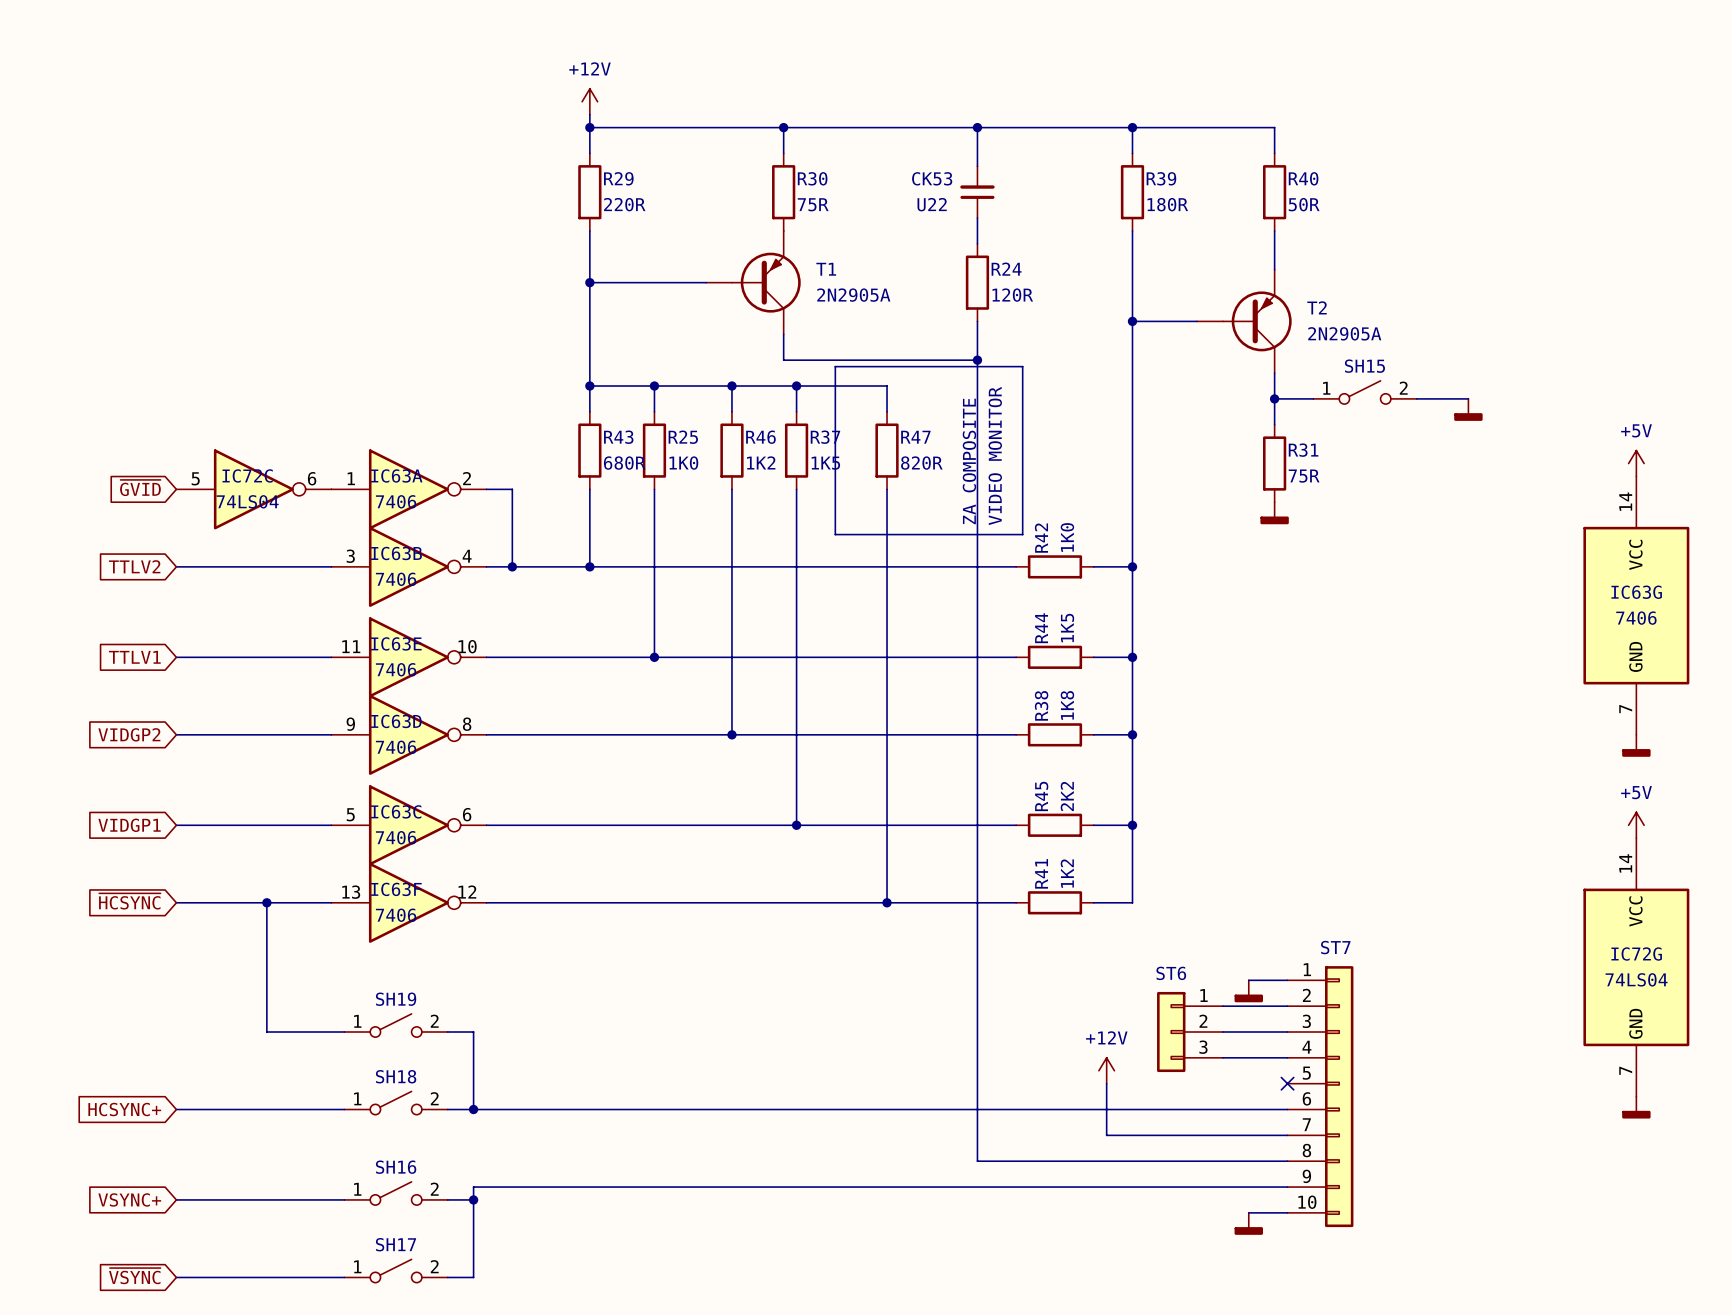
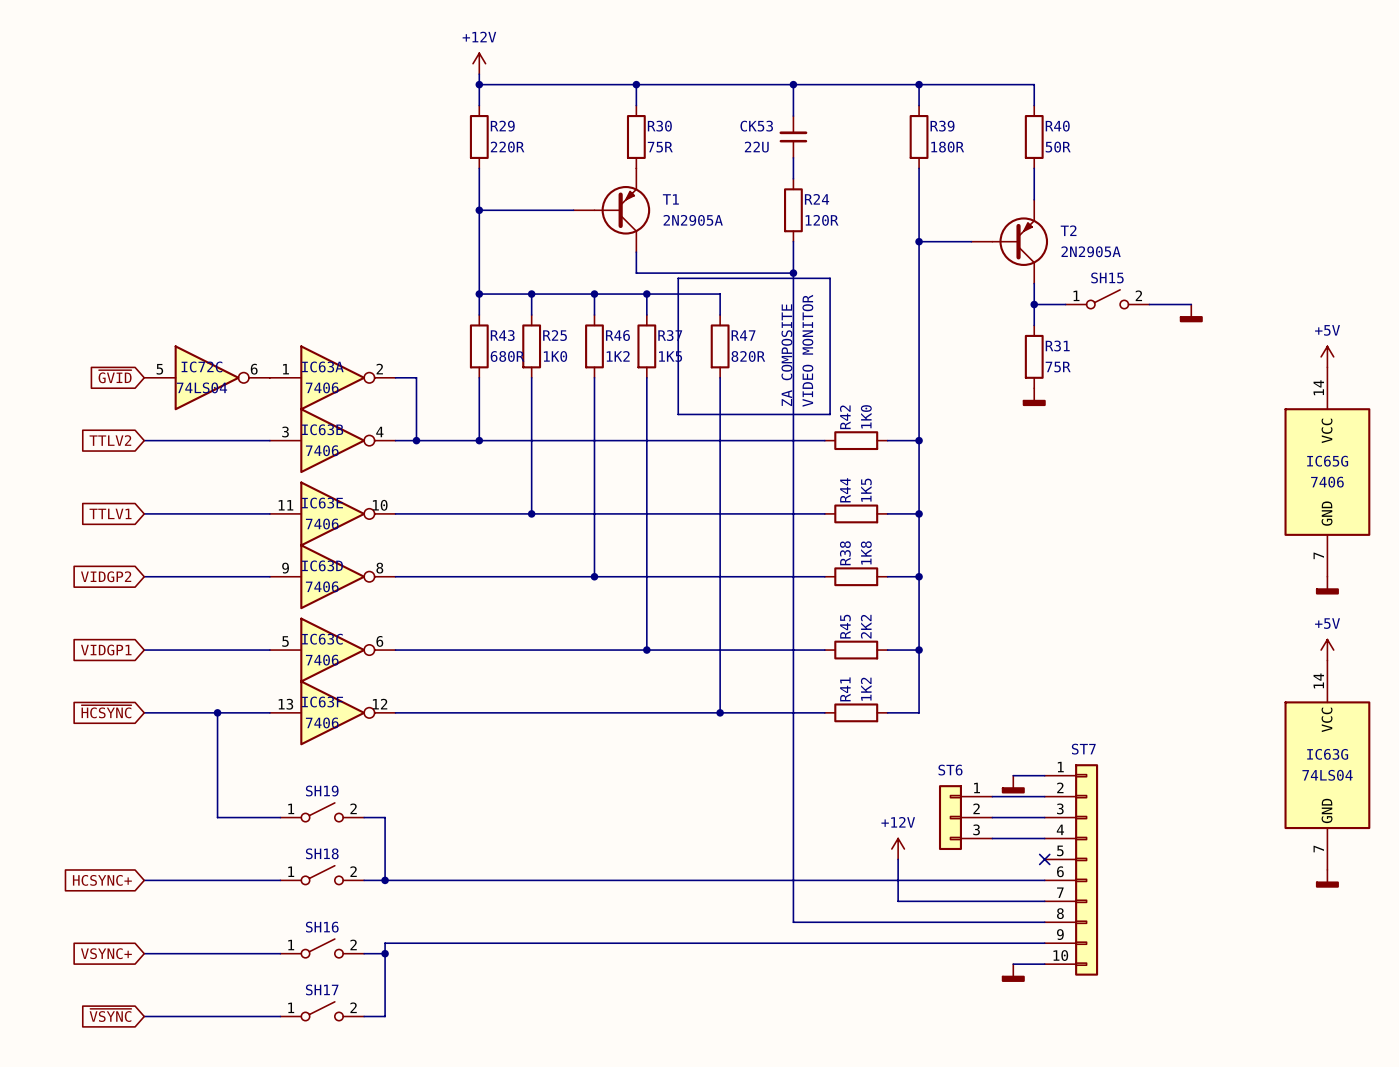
CK53 value: U22 (932, 204) -> 22U (756, 147)
IC63G name: IC63G (1636, 592) -> IC65G (1327, 461)
IC72G name: IC72G (1636, 954) -> IC63G (1327, 754)

